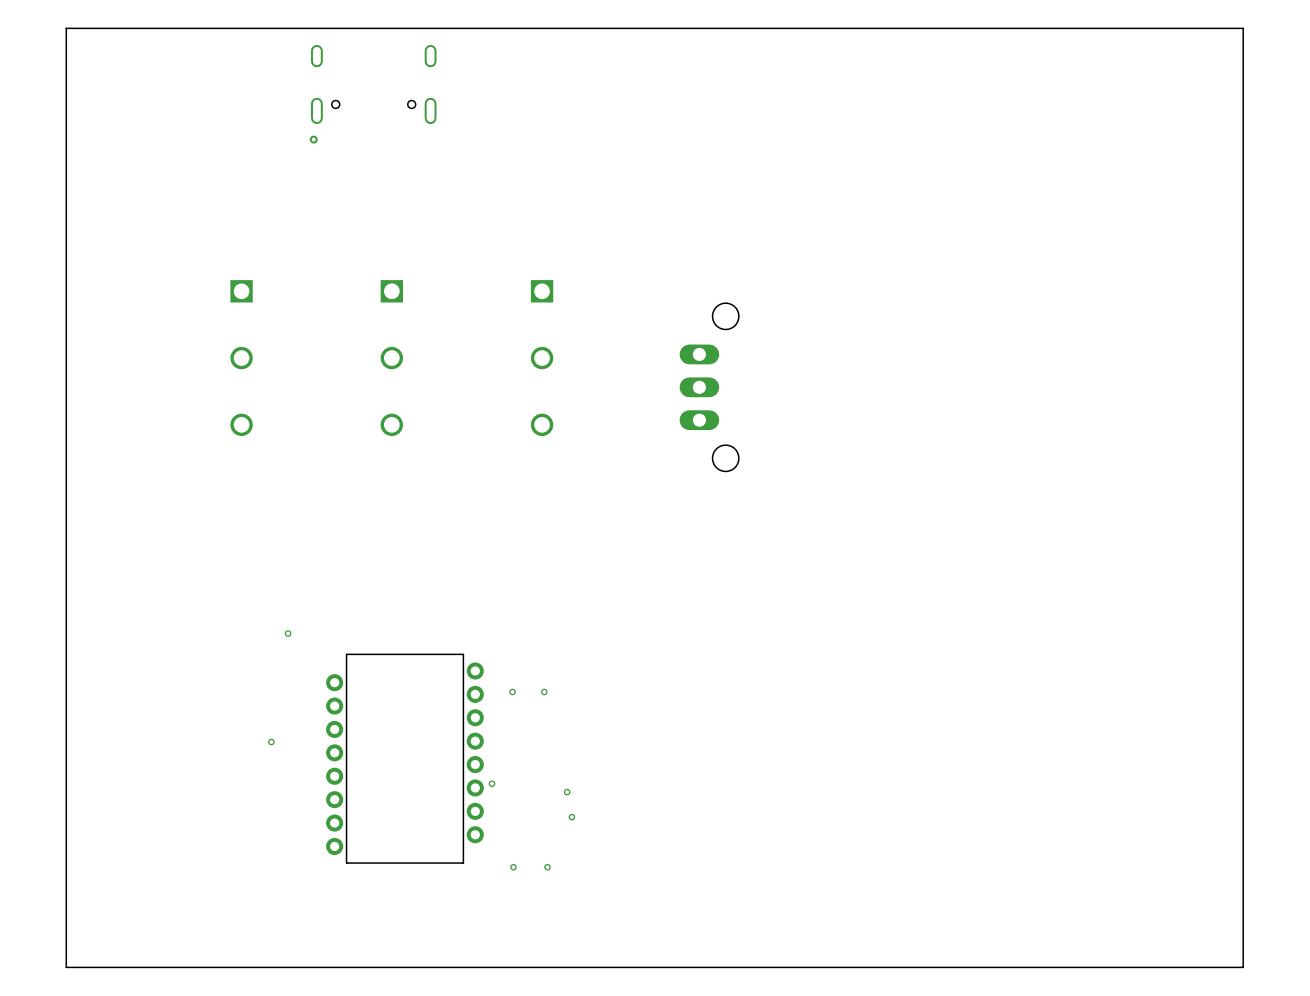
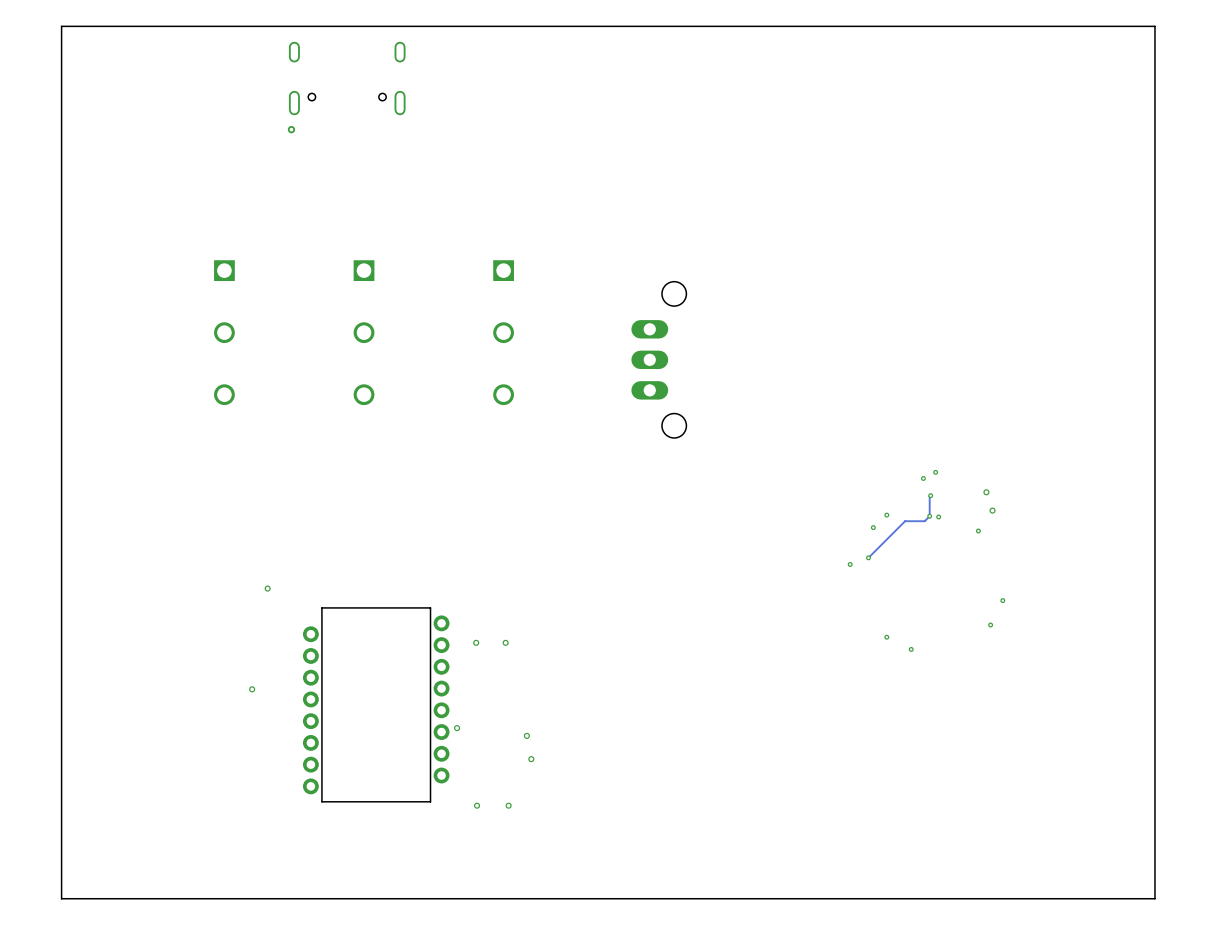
via: none -> (935, 472)
via: none -> (923, 478)
via: none -> (986, 492)
track: none -> (930, 495) (929, 516) (924, 521) (905, 521) (868, 557)
via: none -> (930, 495)
via: none -> (992, 510)
via: none -> (886, 515)
via: none -> (929, 516)
via: none -> (938, 516)
via: none -> (873, 527)
via: none -> (978, 531)
via: none -> (868, 557)
via: none -> (850, 564)
via: none -> (1002, 600)
via: none -> (990, 625)
via: none -> (886, 637)
via: none -> (911, 649)

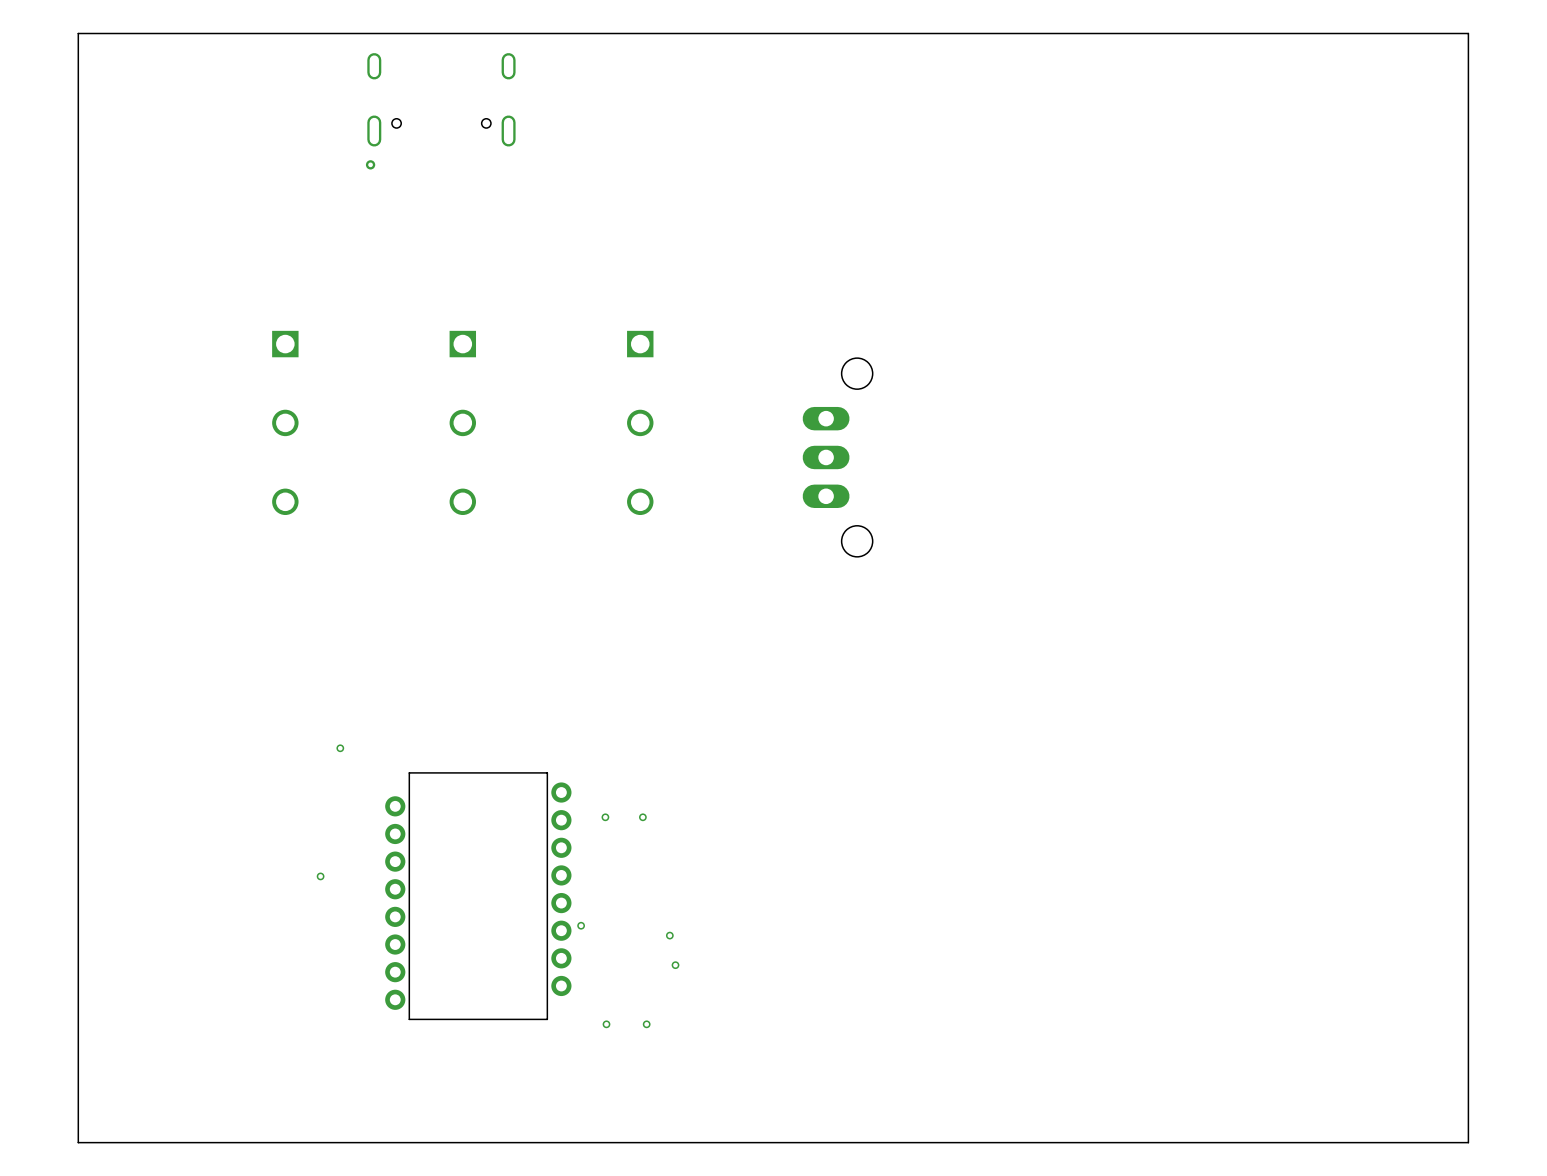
via: (935, 472) -> none
via: (923, 478) -> none
via: (986, 492) -> none
track: (930, 495) (929, 516) (924, 521) (905, 521) (868, 557) -> none
via: (930, 495) -> none
via: (992, 510) -> none
via: (886, 515) -> none
via: (929, 516) -> none
via: (938, 516) -> none
via: (873, 527) -> none
via: (978, 531) -> none
via: (868, 557) -> none
via: (850, 564) -> none
via: (1002, 600) -> none
via: (990, 625) -> none
via: (886, 637) -> none
via: (911, 649) -> none

